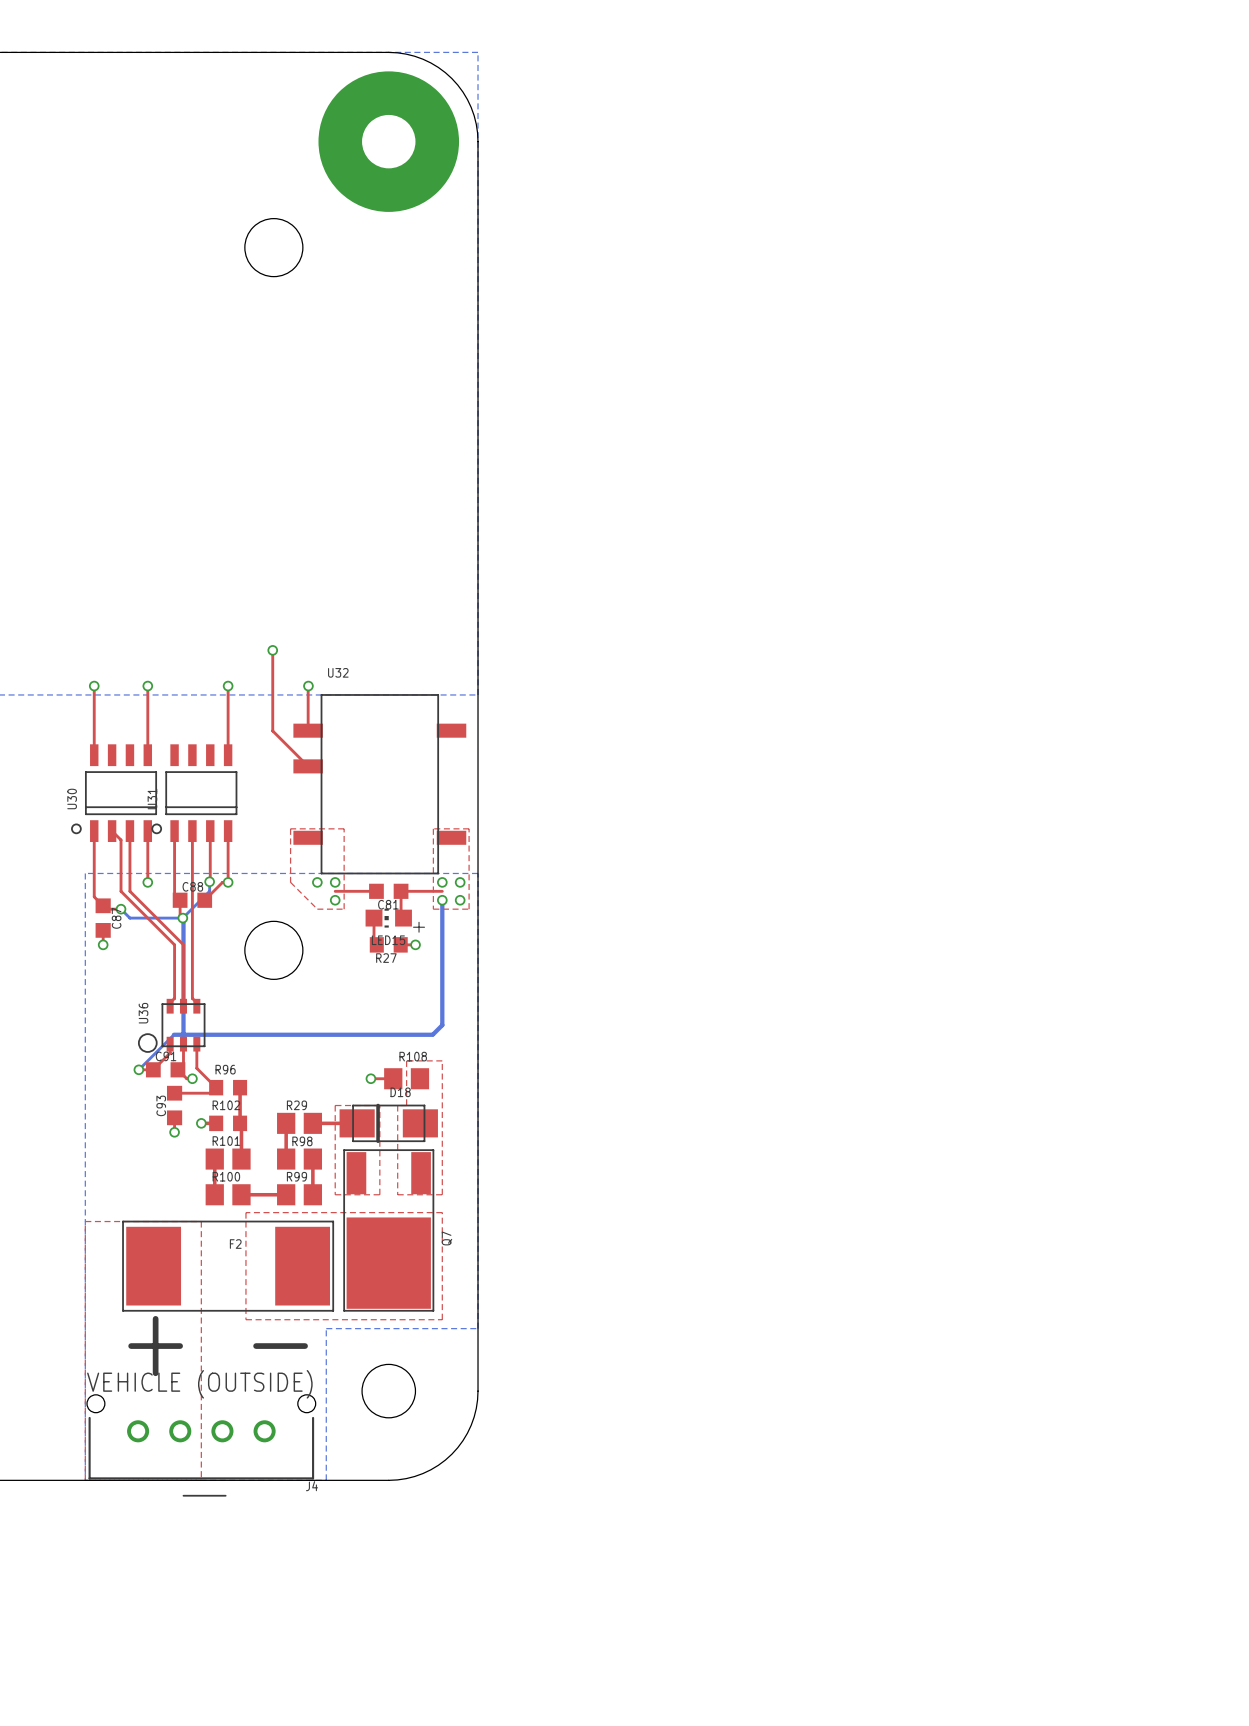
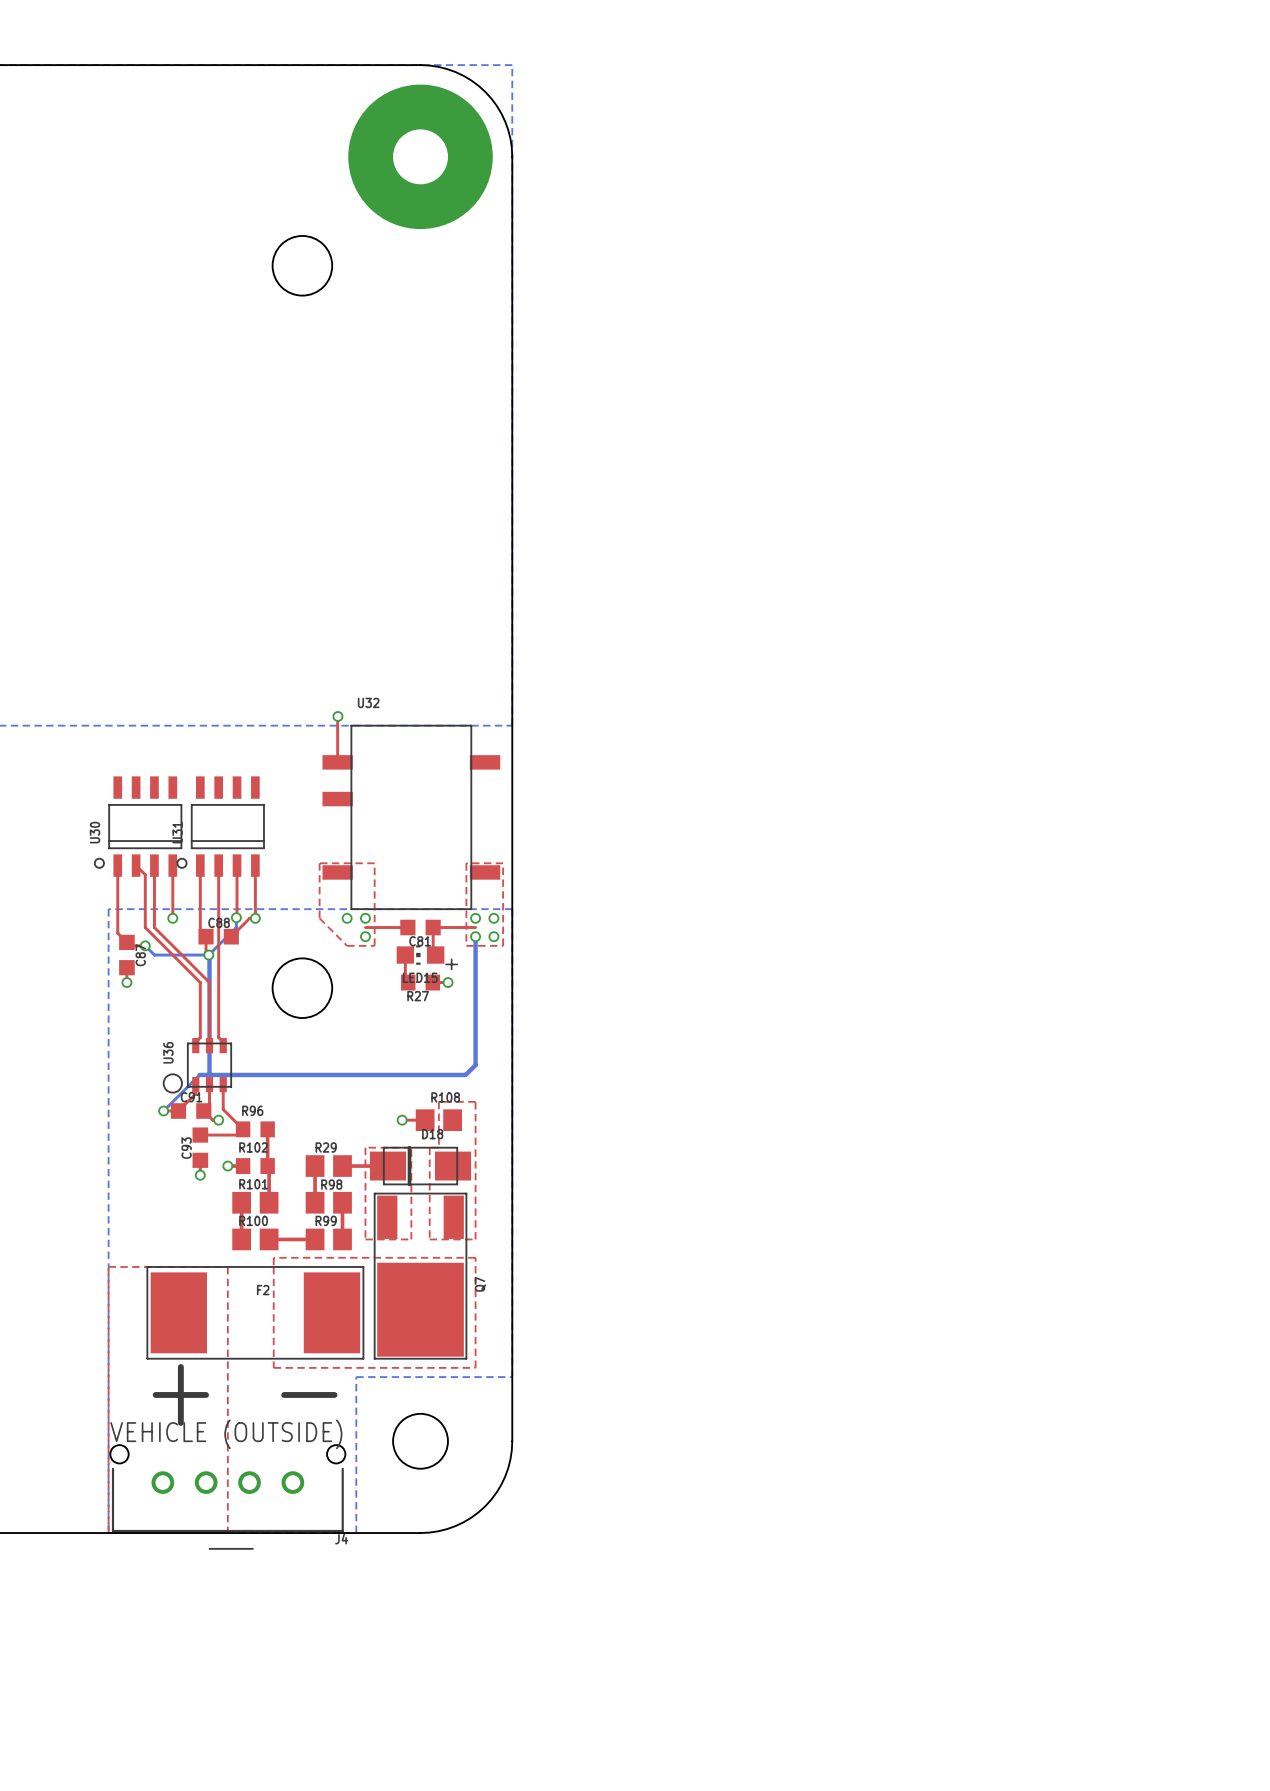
top track: (272, 650) (272, 730) (308, 766) -> none
via: (272, 650) -> none
top track: (94, 686) (94, 755) -> none
via: (94, 686) -> none
top track: (147, 686) (147, 755) -> none
via: (147, 686) -> none
top track: (228, 686) (228, 755) -> none
via: (228, 686) -> none

